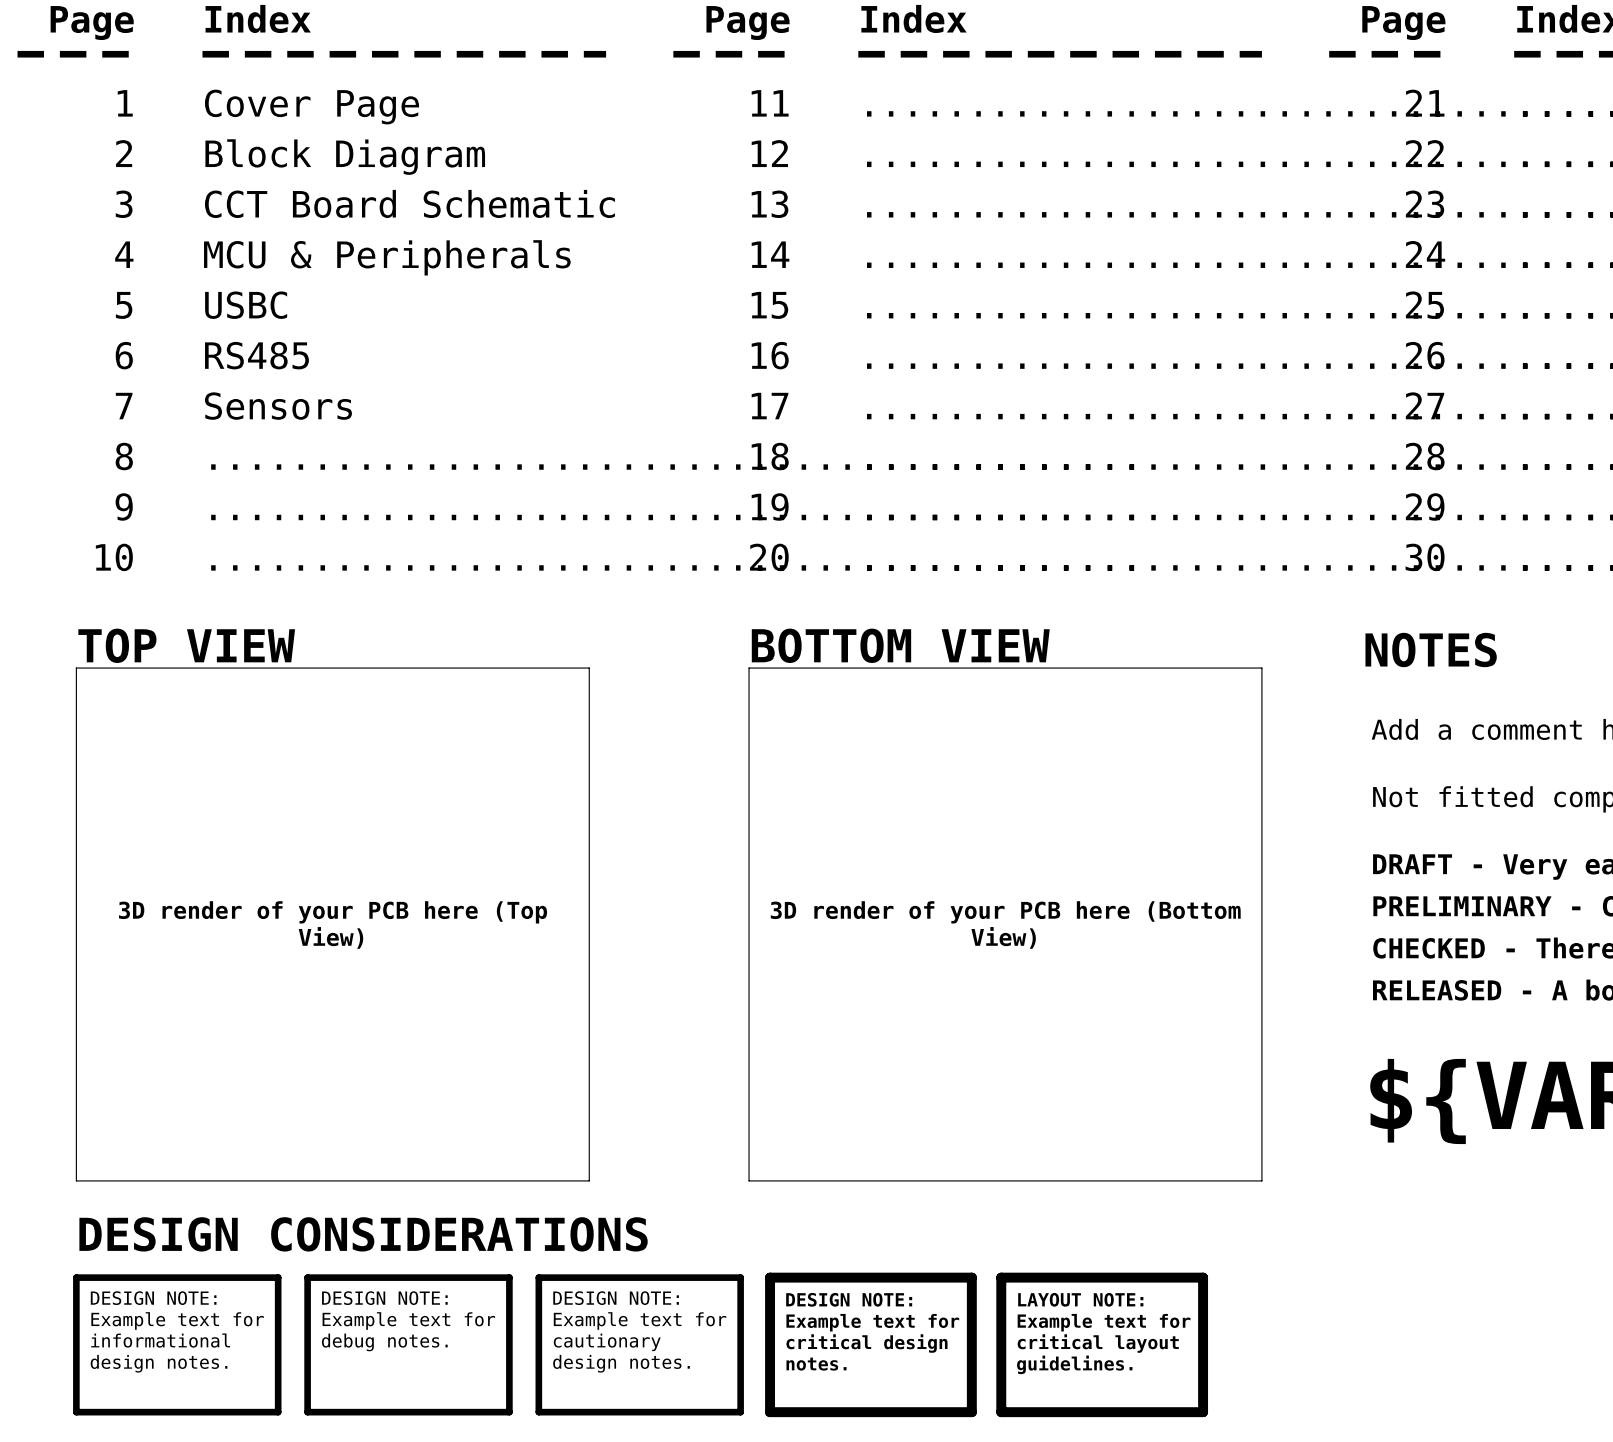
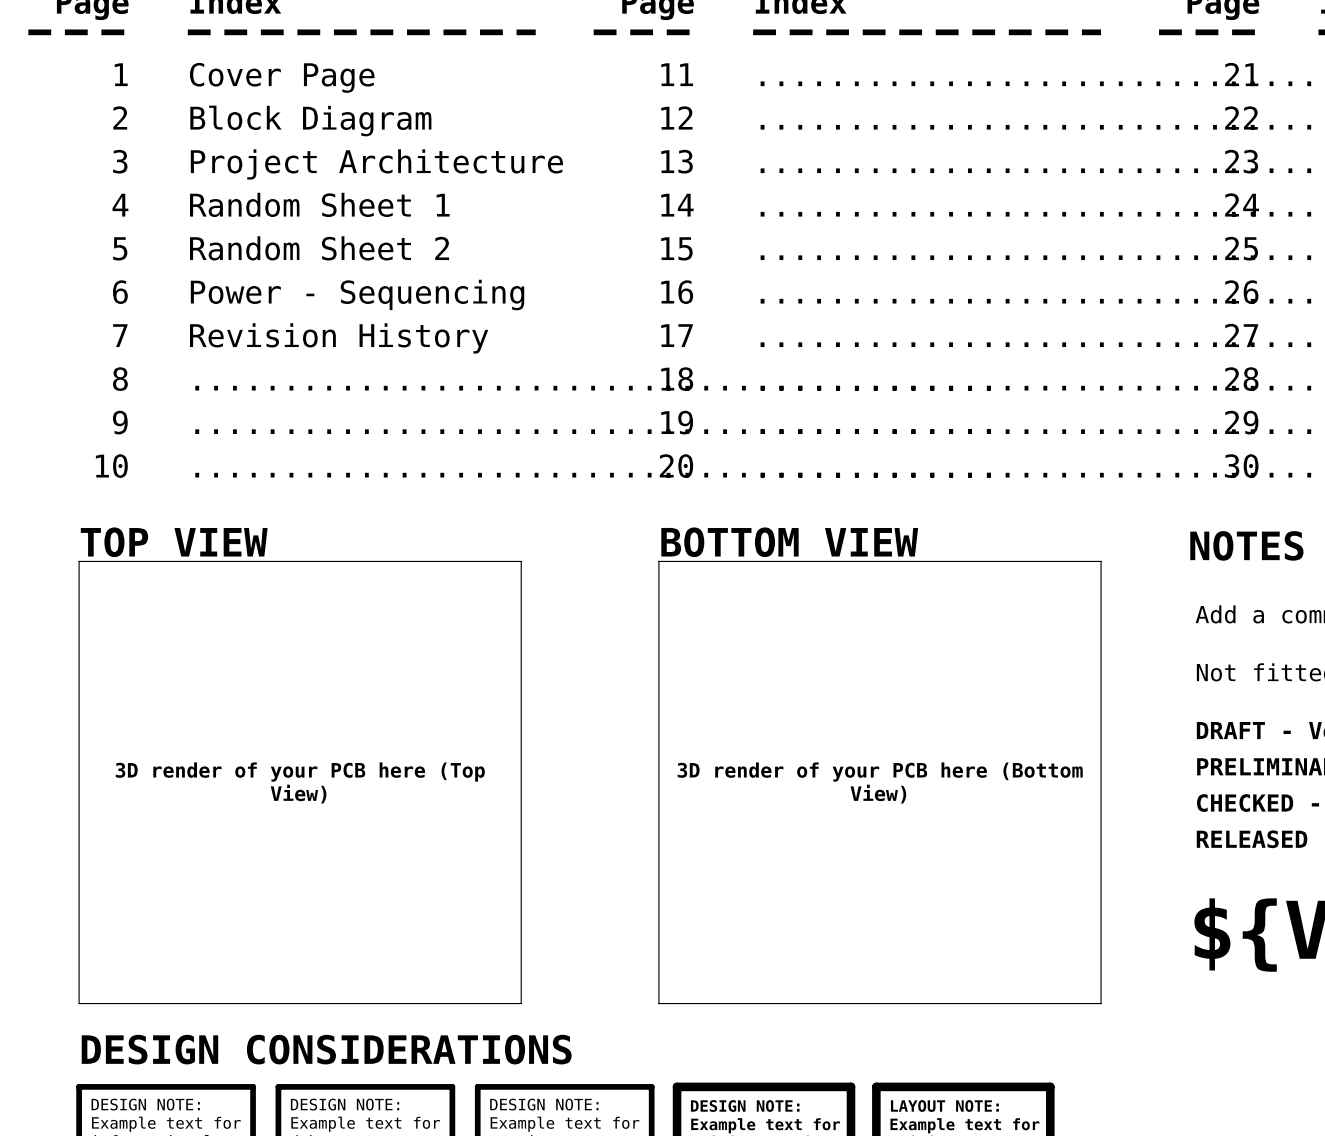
text: CCT Board Schematic (409, 203) -> Project Architecture (376, 164)
text: MCU & Peripherals (387, 257) -> Random Sheet 1 (319, 204)
text: USBC (246, 305) -> Random Sheet 2 (319, 248)
text: RS485 (256, 355) -> Power - Sequencing (357, 295)
text: Sensors (278, 406) -> Revision History (339, 338)

